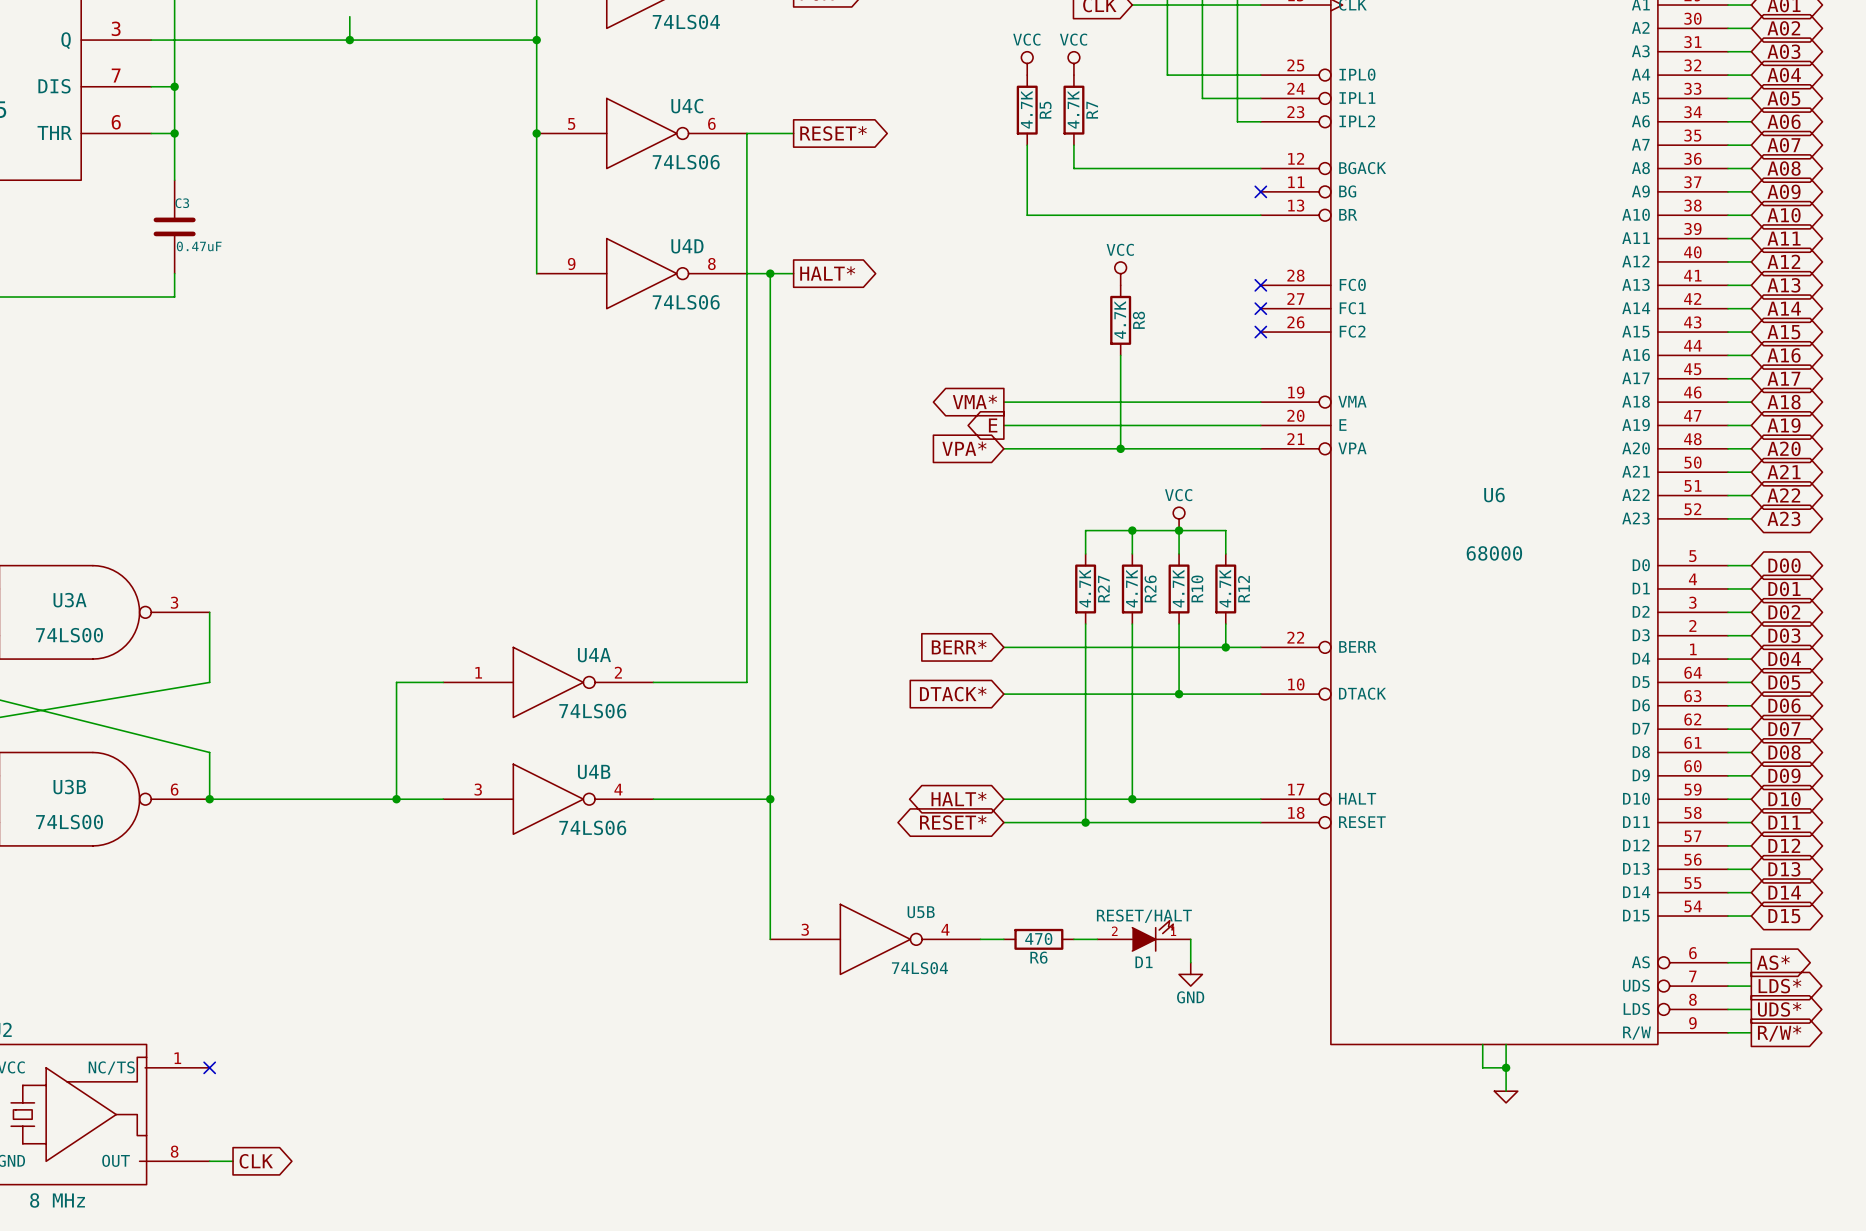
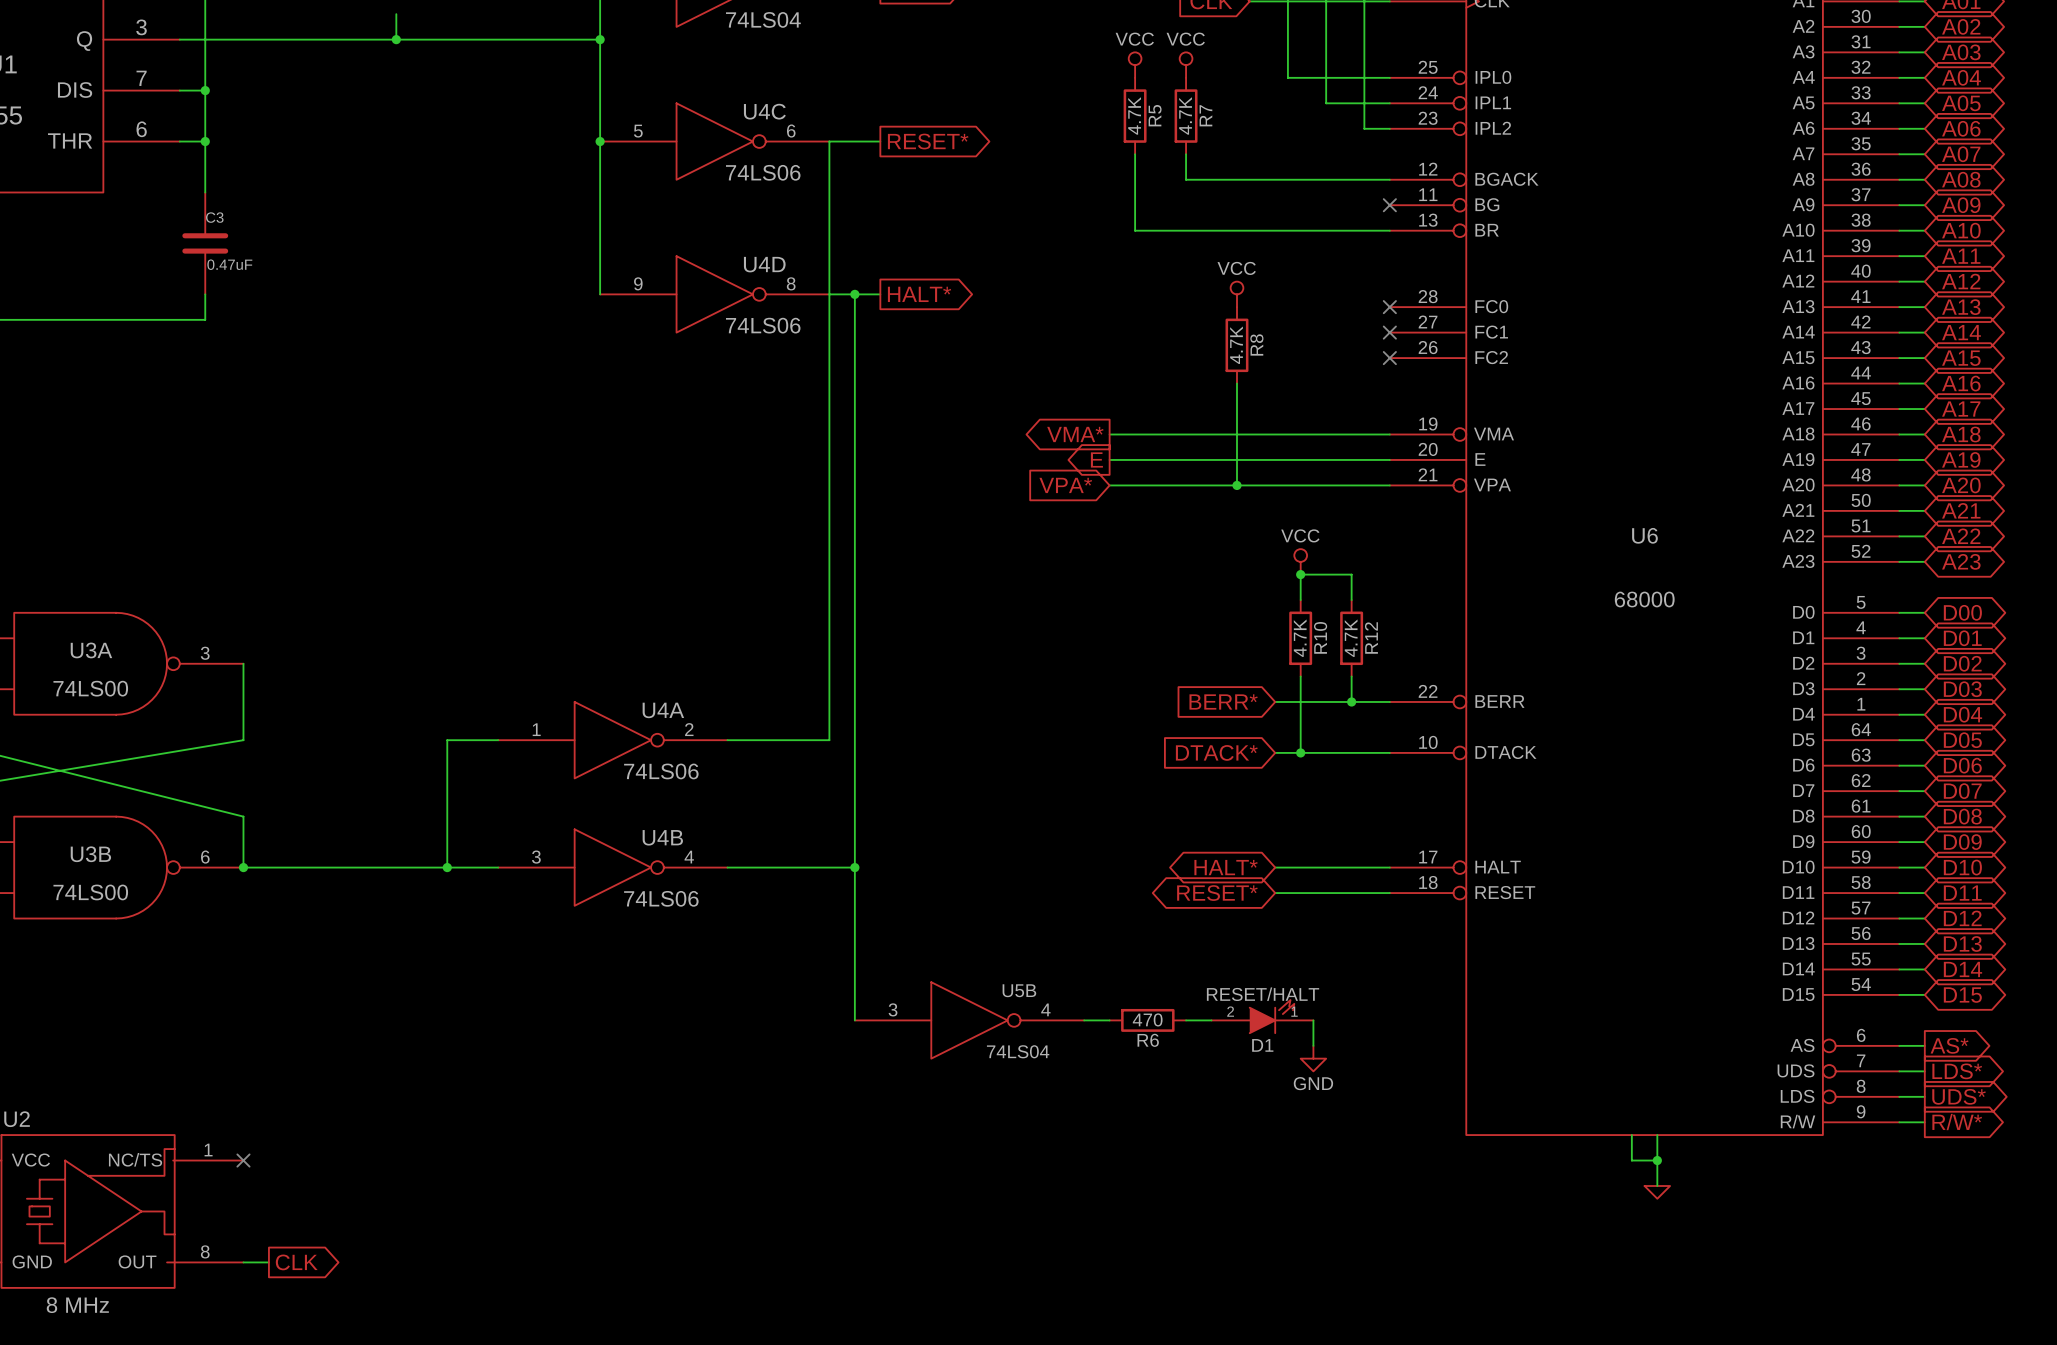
wire: (1132, 530) (1132, 553) -> none
junction: (1132, 530) -> none
wire: (1179, 530) (1085, 530) (1085, 553) -> none
R27: 4.7K (1085, 588) -> none
R26: 4.7K (1132, 588) -> none
wire: (1085, 624) (1085, 822) -> none
wire: (1132, 624) (1132, 799) -> none
global label position: BERR* (959, 647) -> BERR* (1223, 701)
wire: (1003, 647) (1155, 647) -> none
global label position: DTACK* (953, 694) -> DTACK* (1216, 752)
wire: (1003, 694) (1155, 694) -> none
global label position: HALT* (959, 799) -> HALT* (1226, 867)
wire: (1003, 799) (1155, 799) -> none
junction: (1132, 799) -> none
global label position: RESET* (953, 822) -> RESET* (1217, 893)
wire: (1003, 822) (1155, 822) -> none
junction: (1085, 822) -> none

